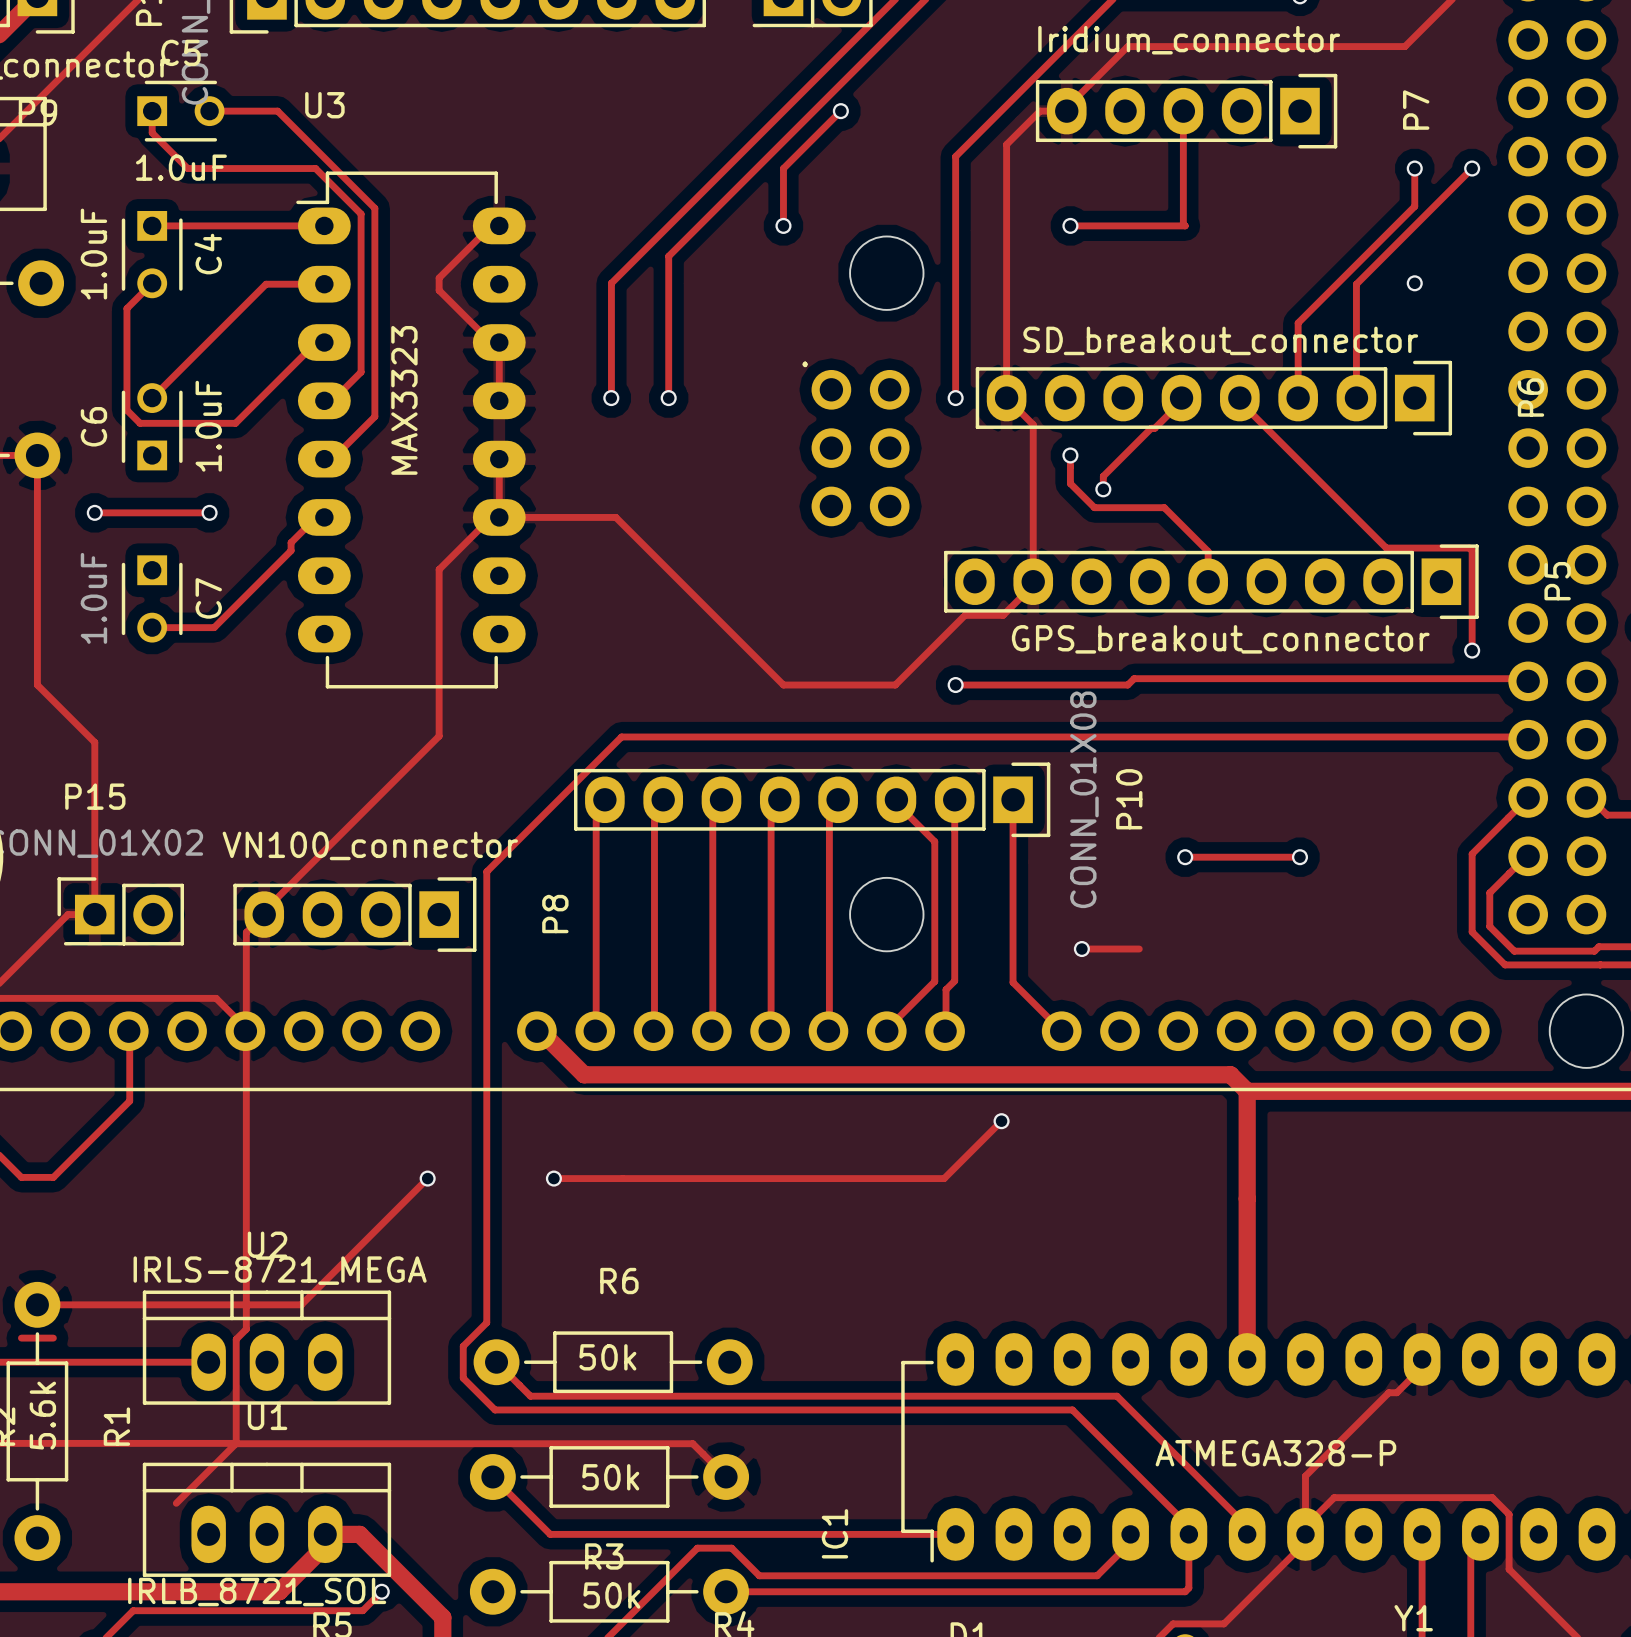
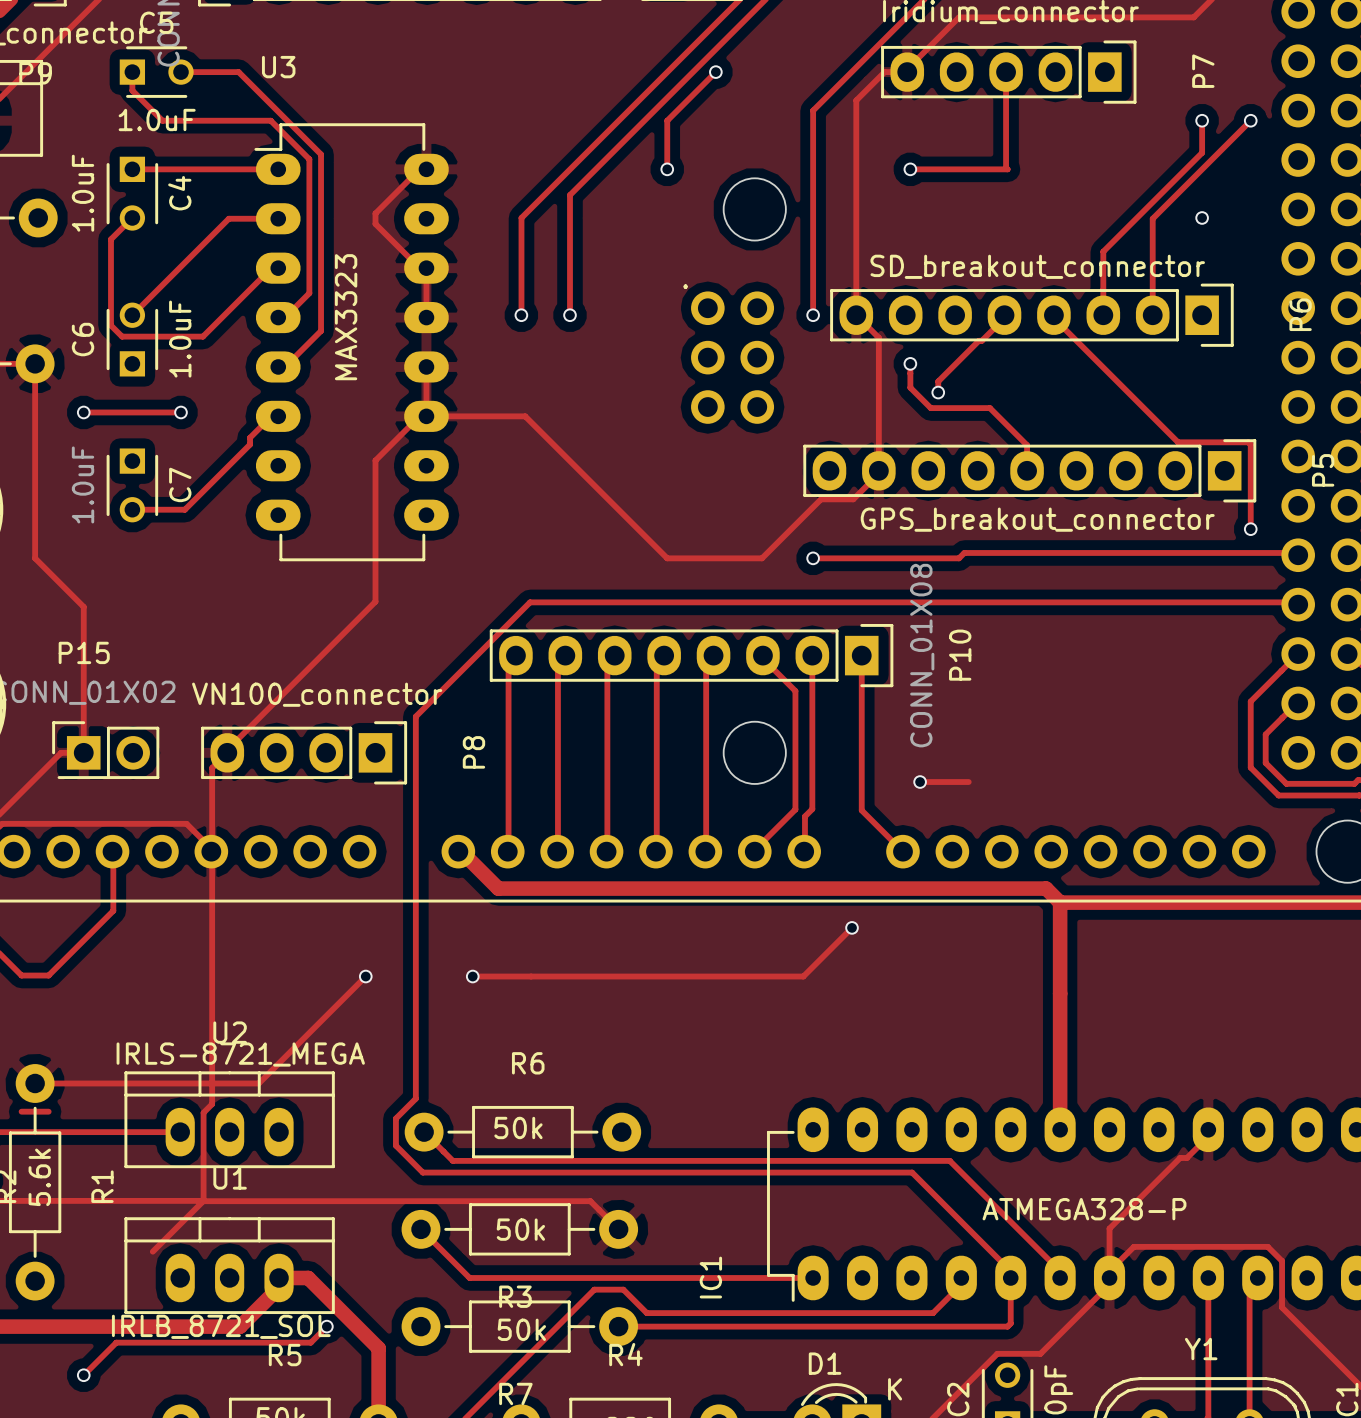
track: (1185, 857) (1299, 857) -> none
via: (1185, 857) -> none
via: (1299, 857) -> none

